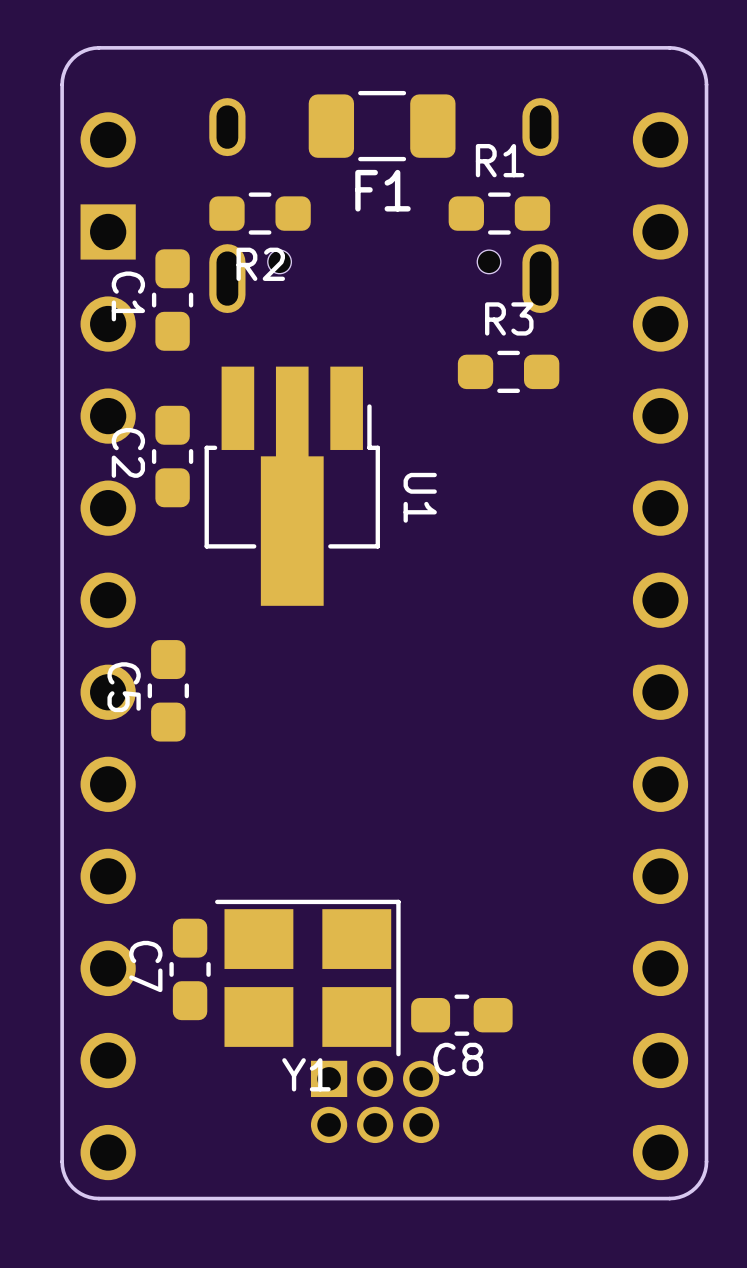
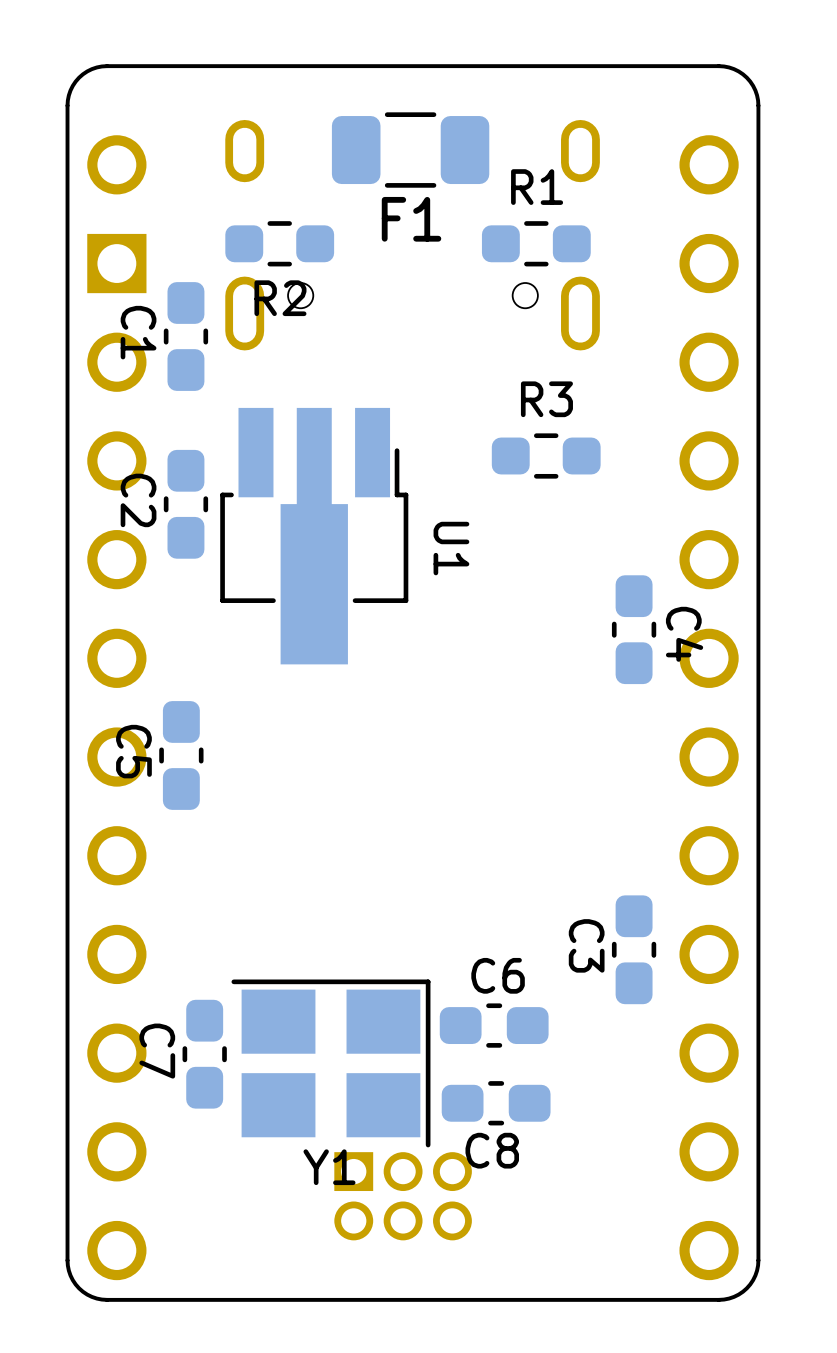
R3 position: (508, 371) -> (546, 456)
C4: none -> (634, 629)
C3: none -> (634, 949)
C6: none -> (494, 1025)

